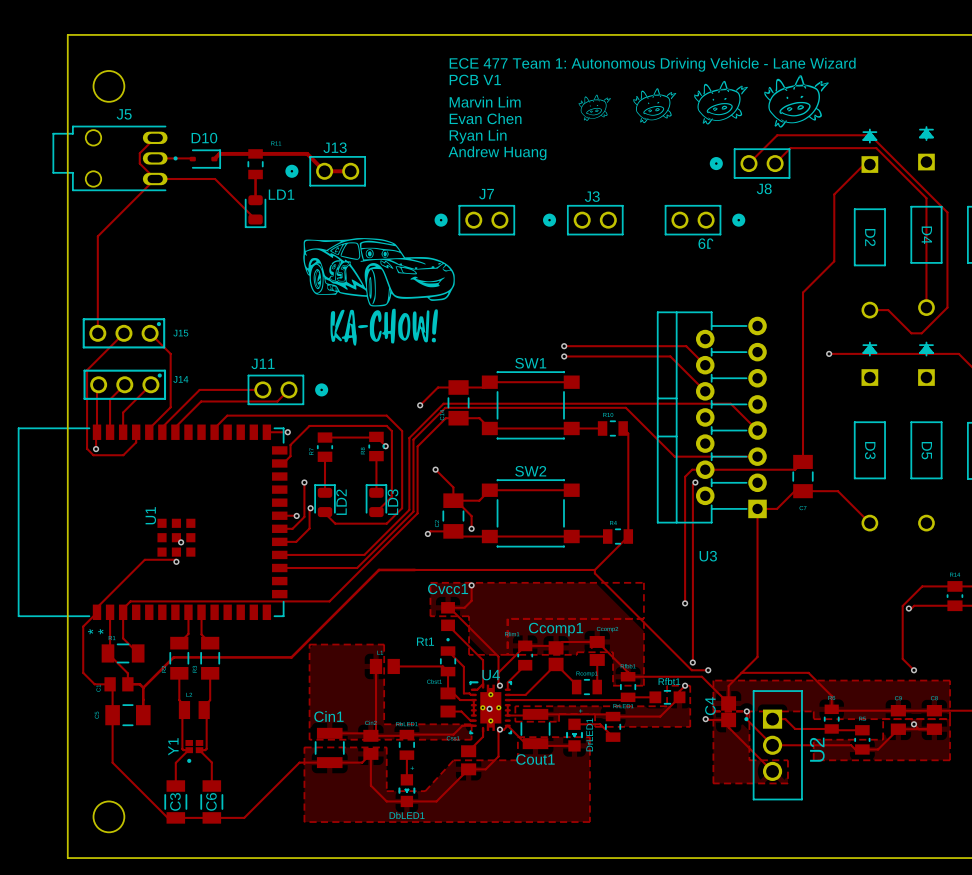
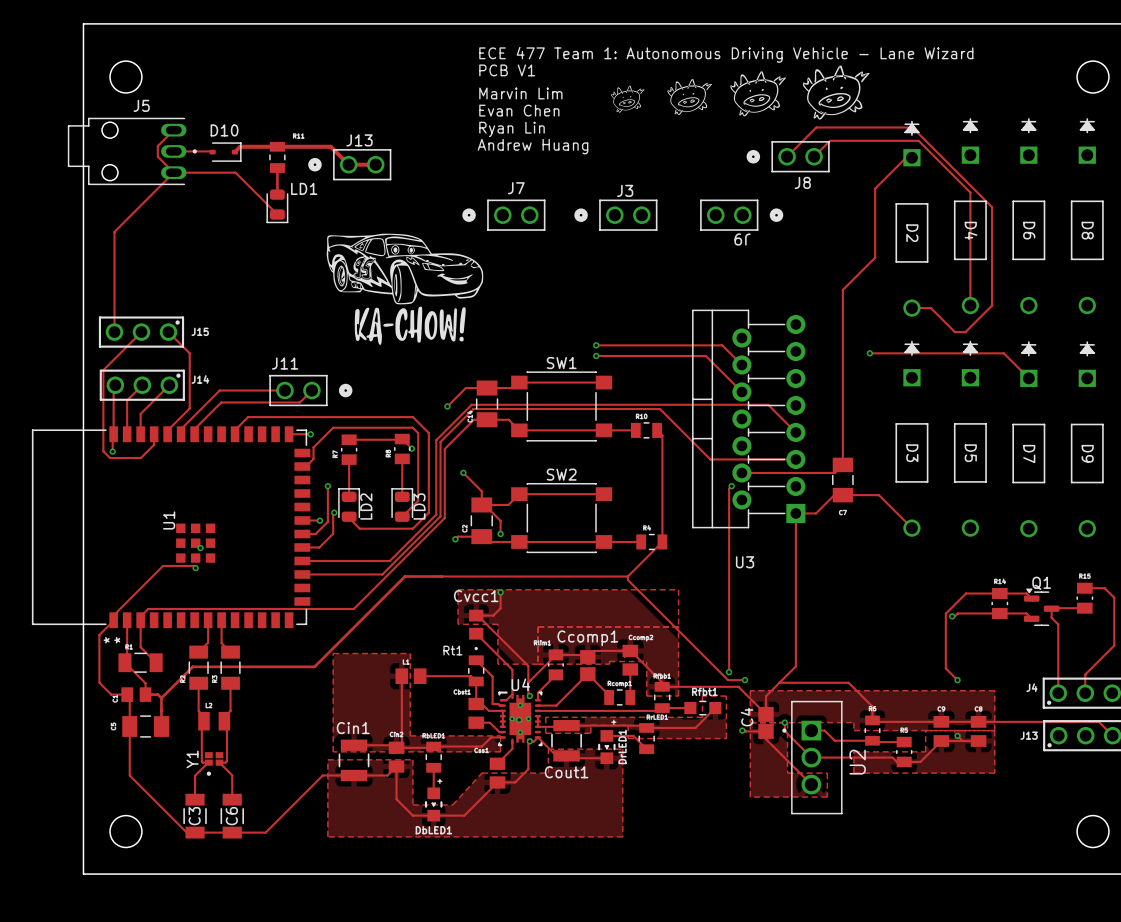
track: (705, 469) (692, 469) (685, 476) (685, 603) -> none
via: (685, 603) -> none
track: (685, 685) (679, 691) (679, 697) -> none
via: (685, 685) -> none

